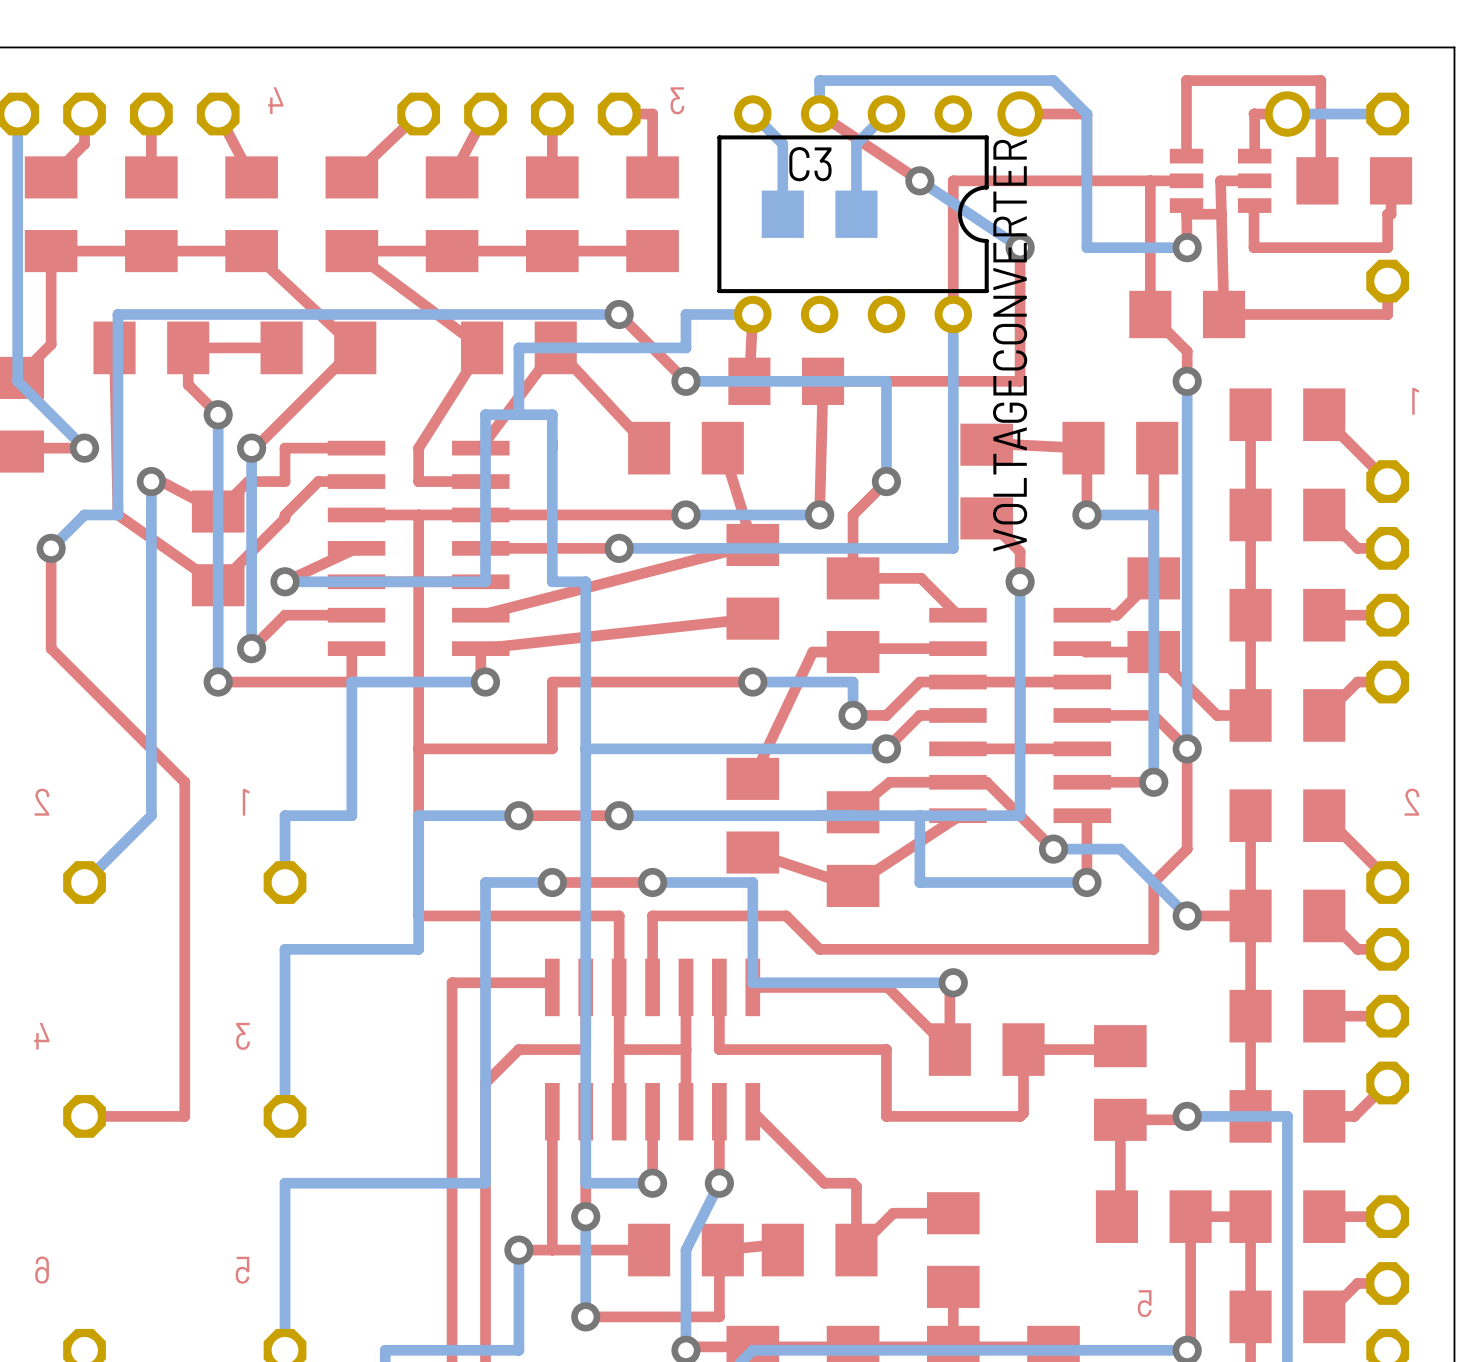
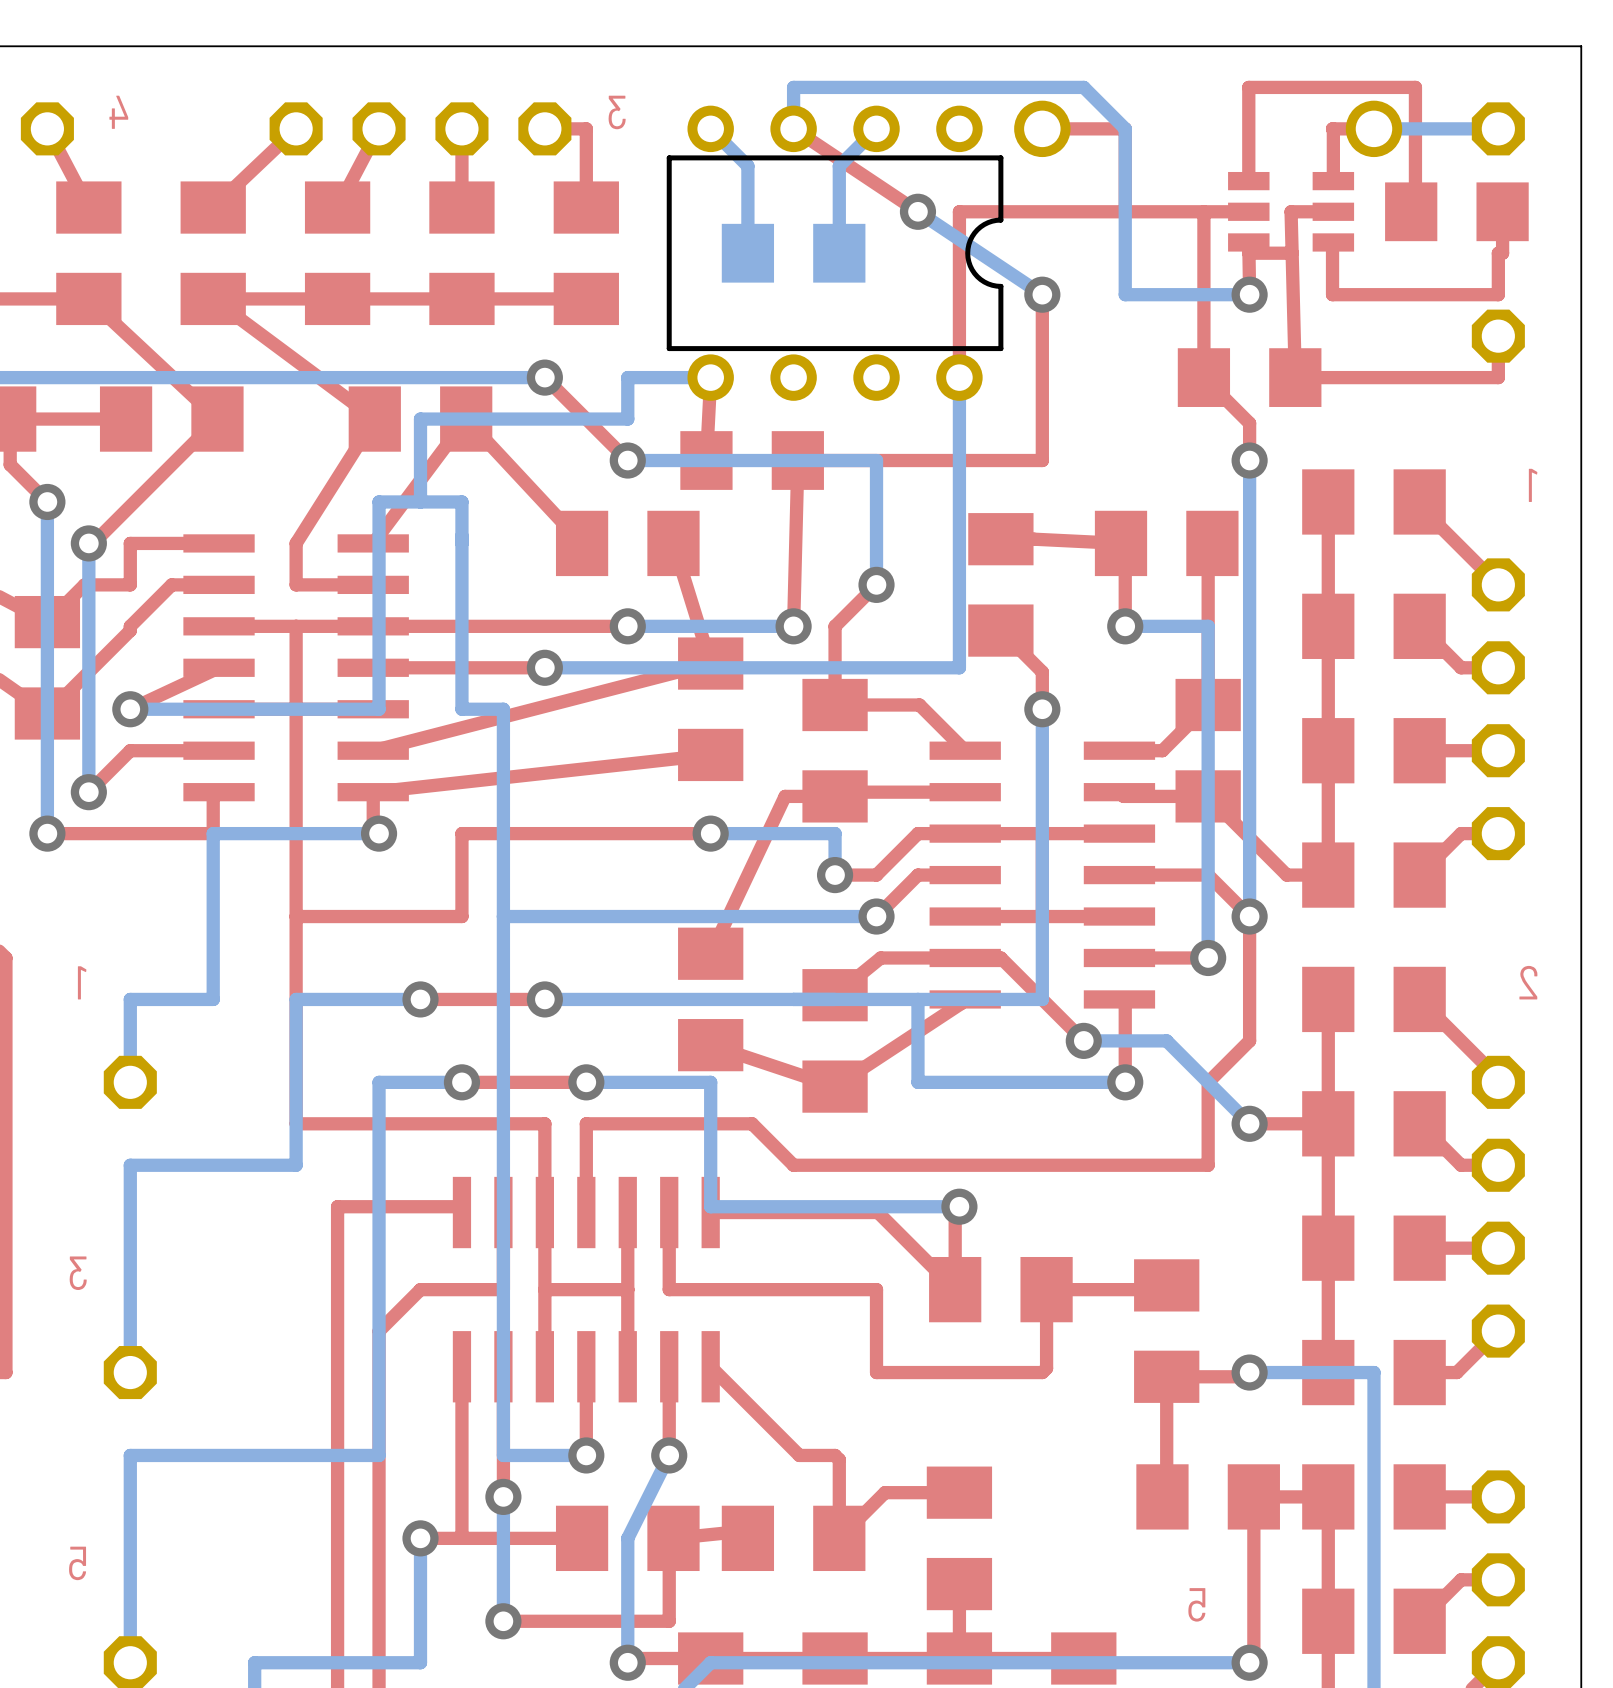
C3 name: C3 (810, 164) -> none
VOLTAGECONVERTER name: VOLTAGECONVERTER (1010, 345) -> none

